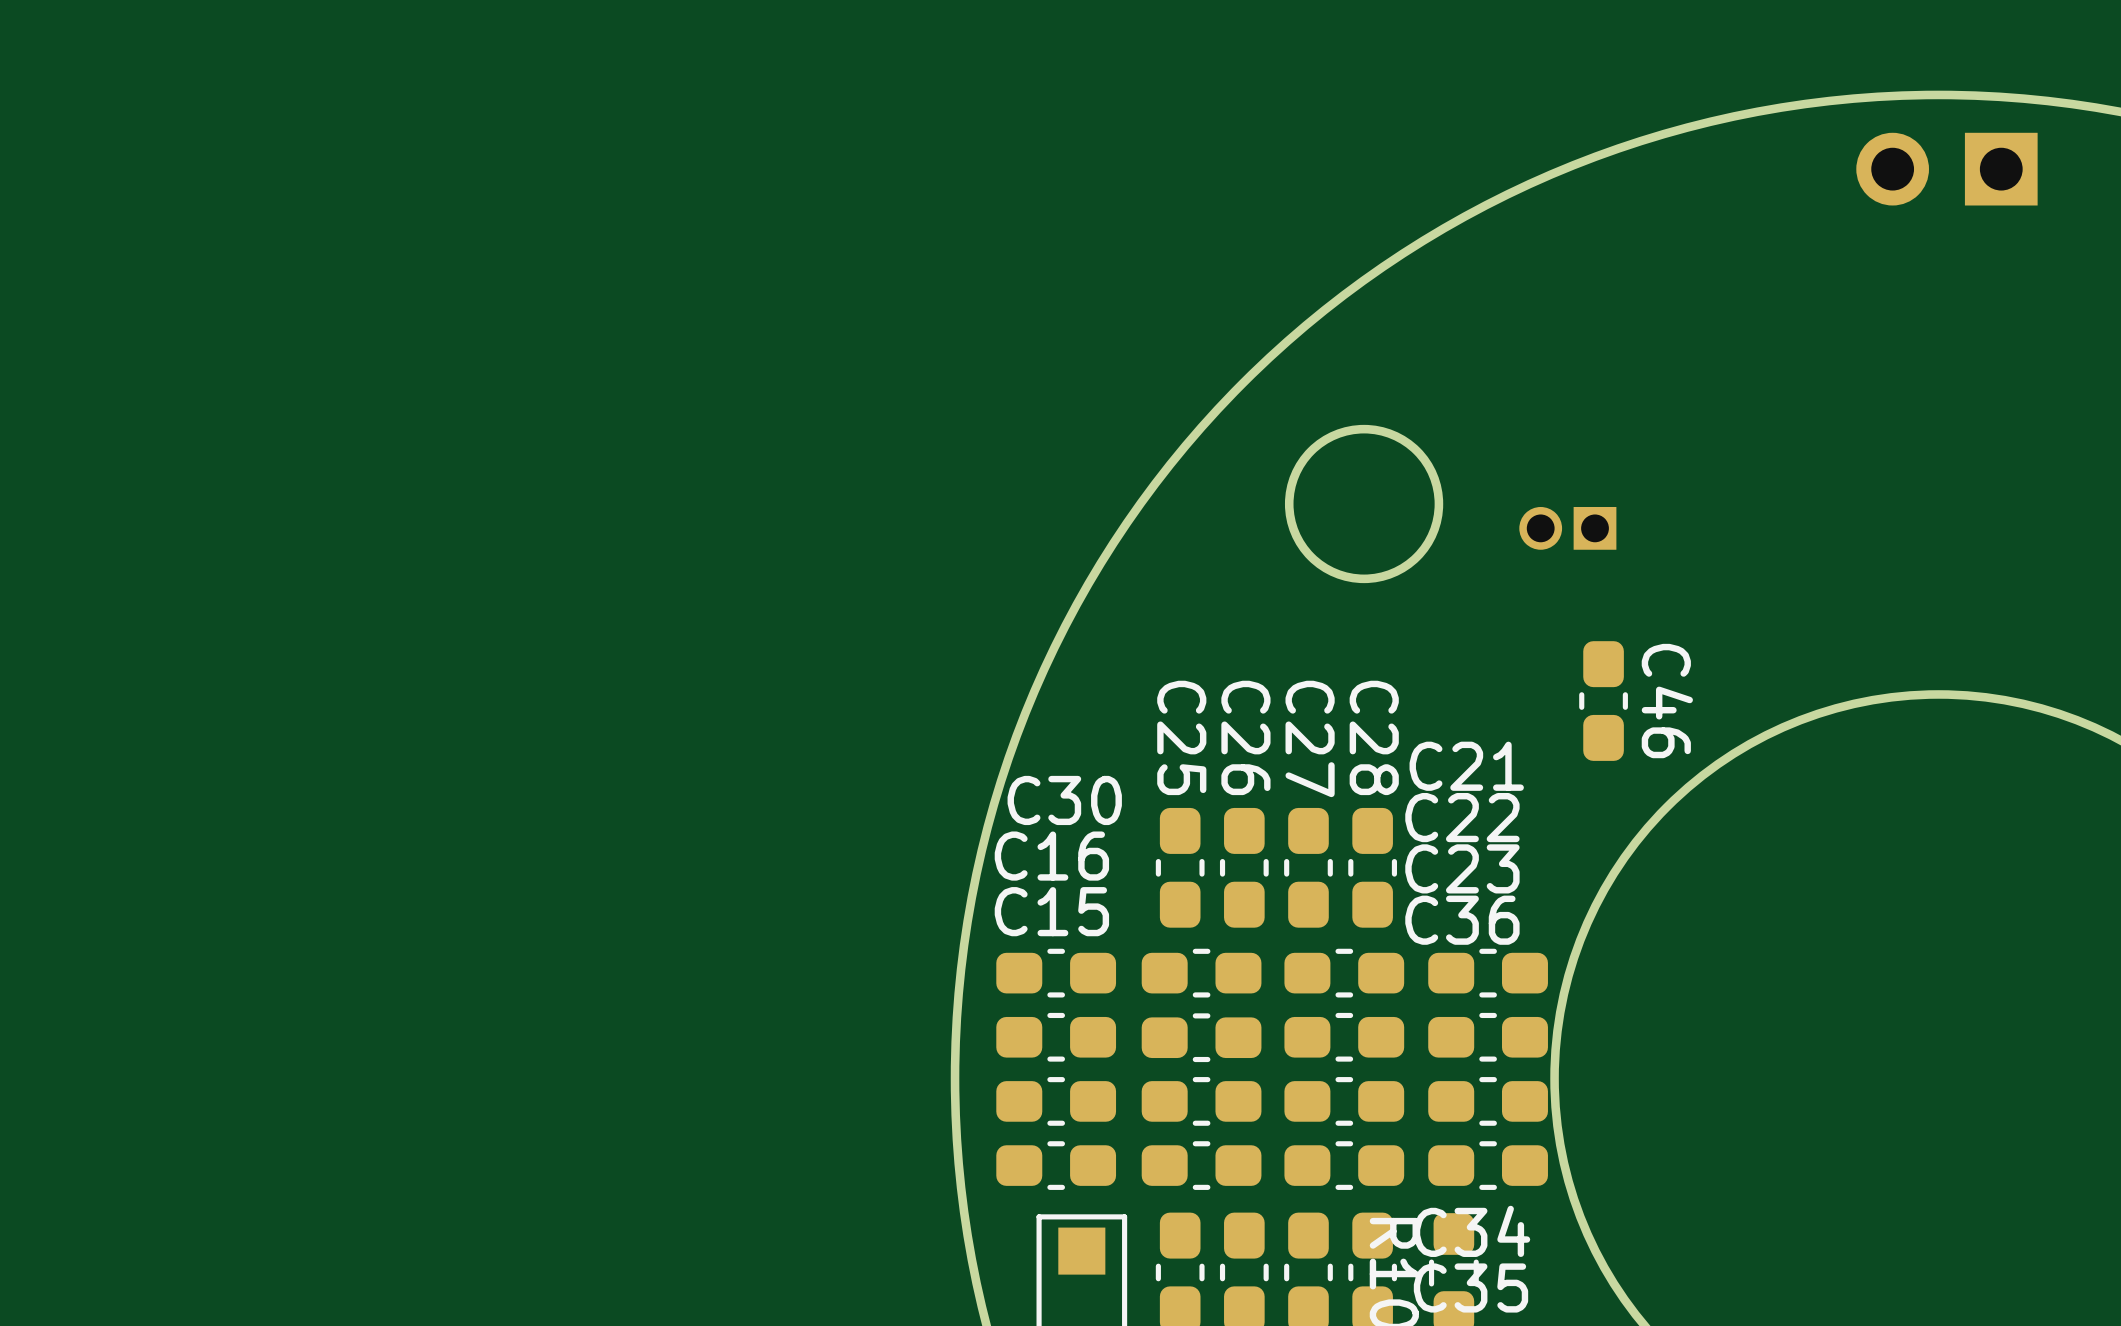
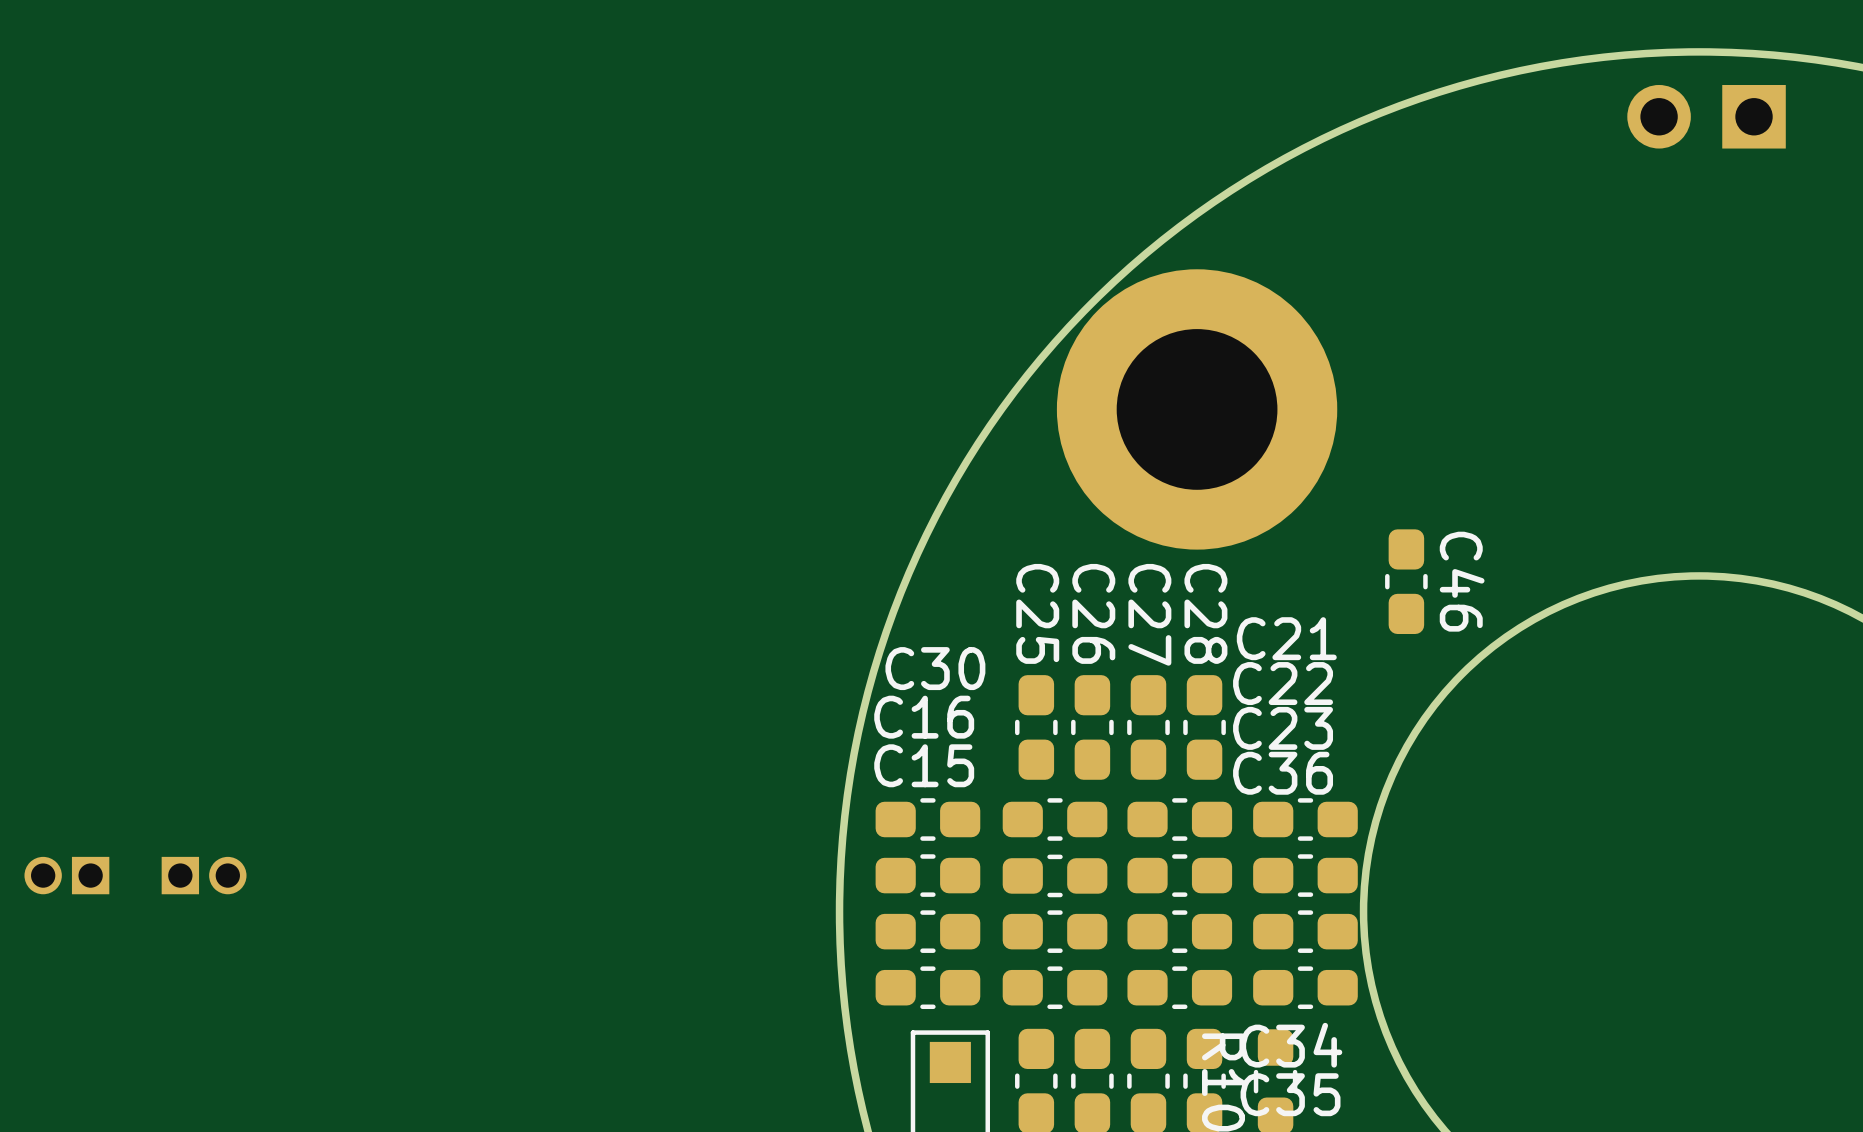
round board edge: [1284, 424, 1444, 584] -> none
part: none -> (1197, 409)
part: (1567, 528) -> none
part: none -> (66, 875)
part: none -> (204, 875)

